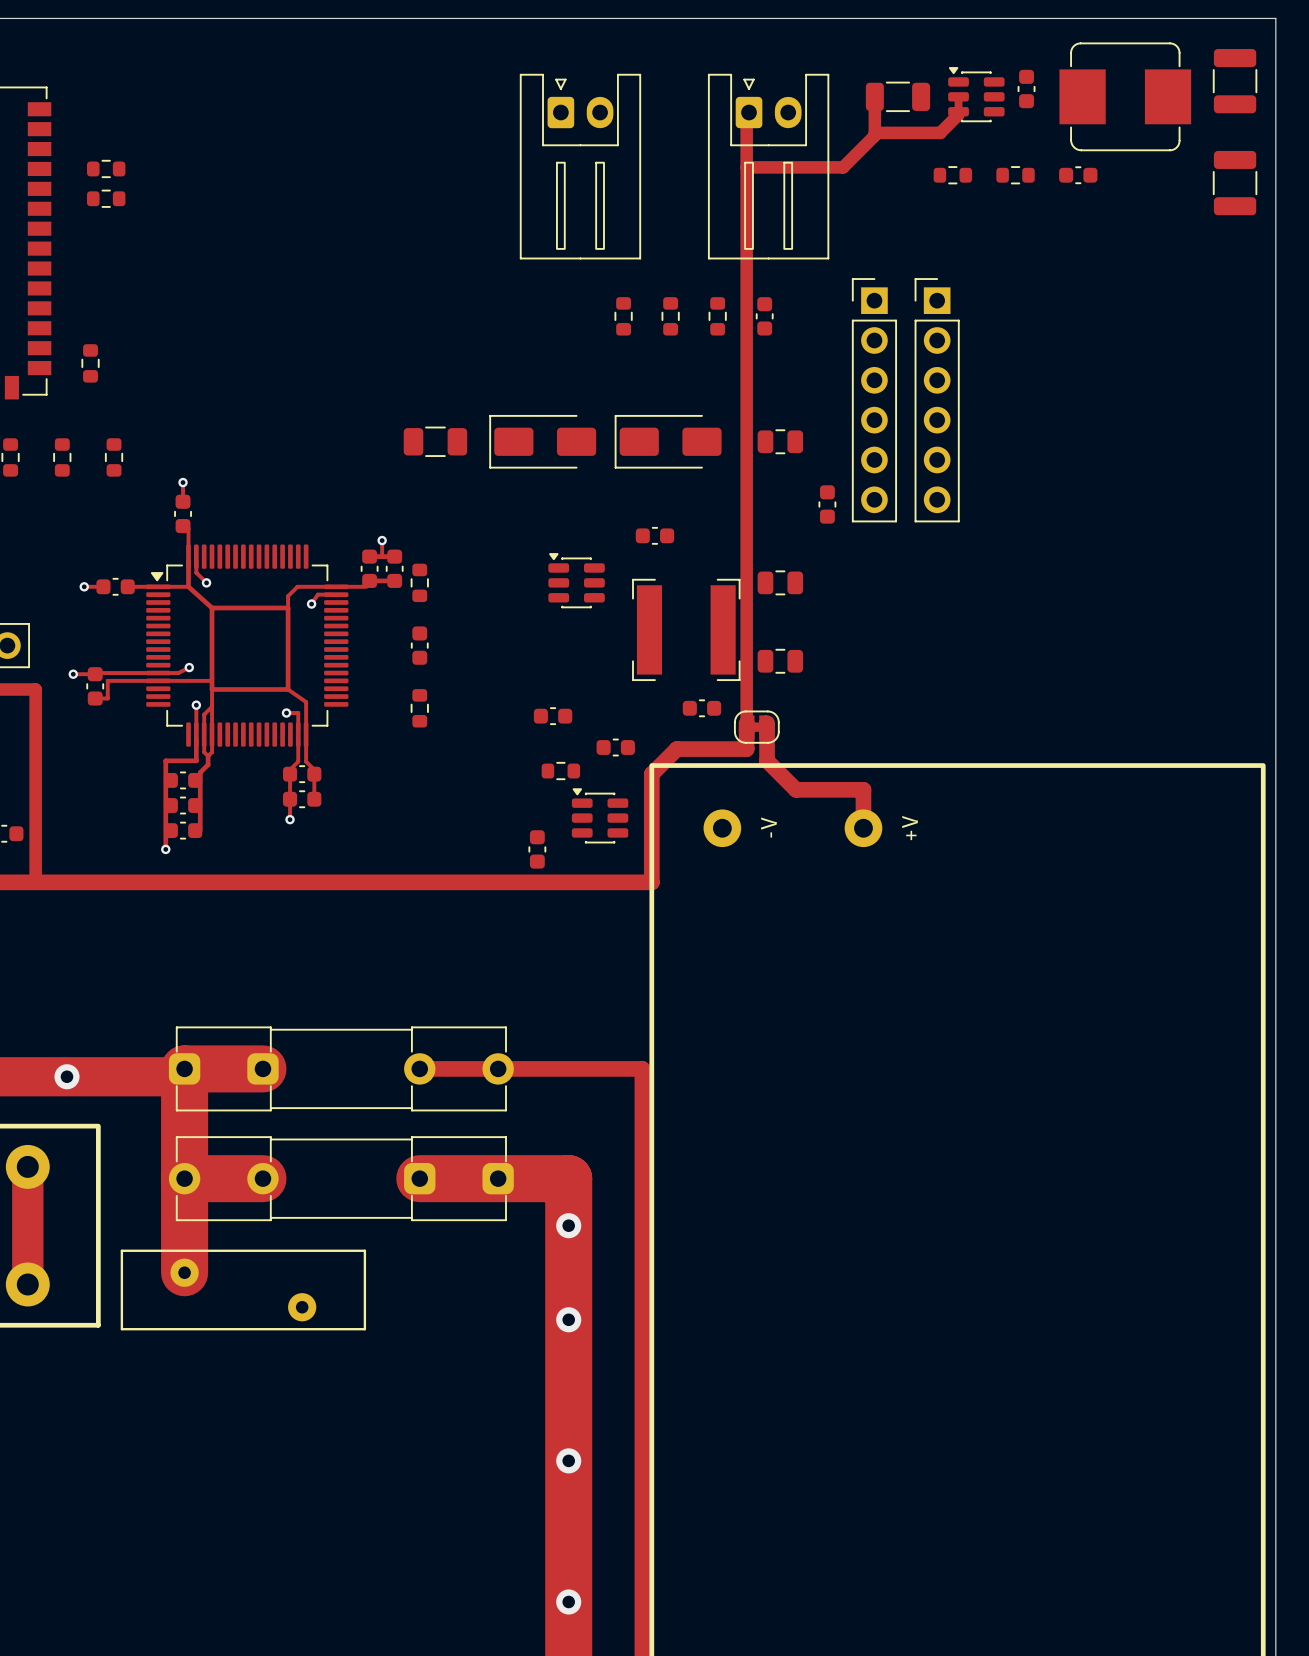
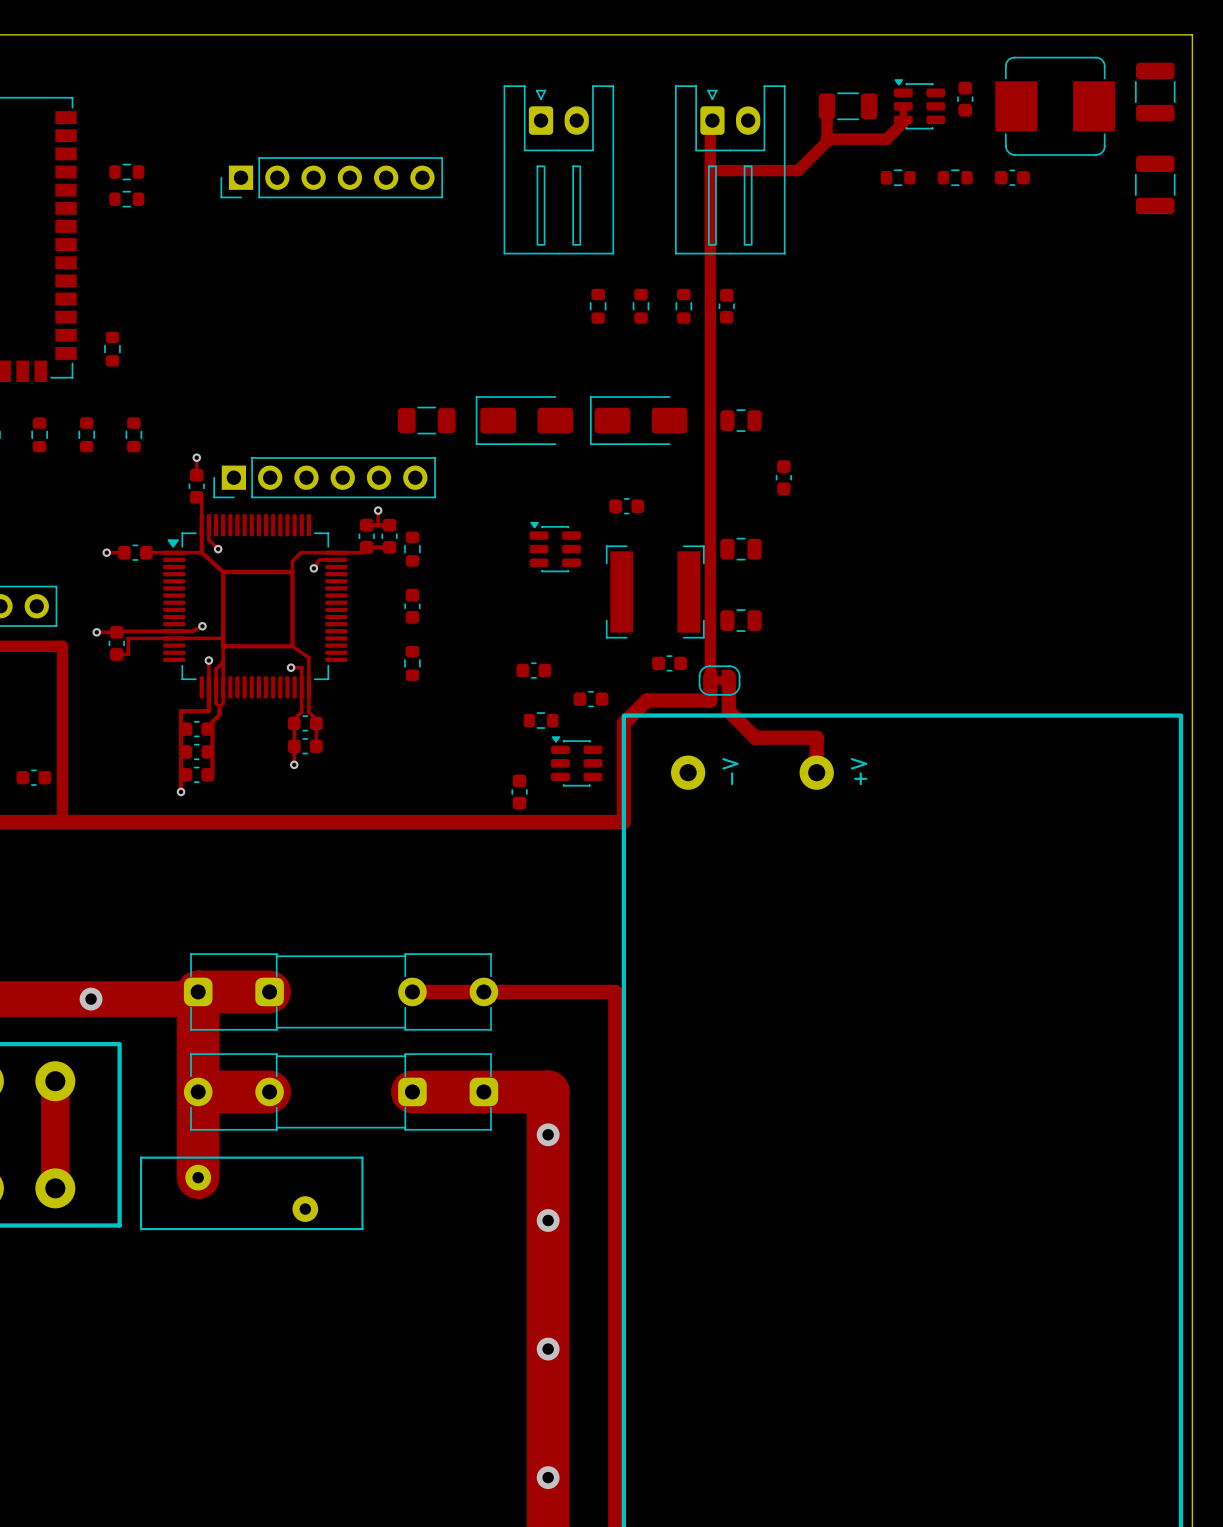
part: none -> (331, 177)
part: (874, 400) -> none
part: (937, 400) -> none
part: none -> (324, 477)

